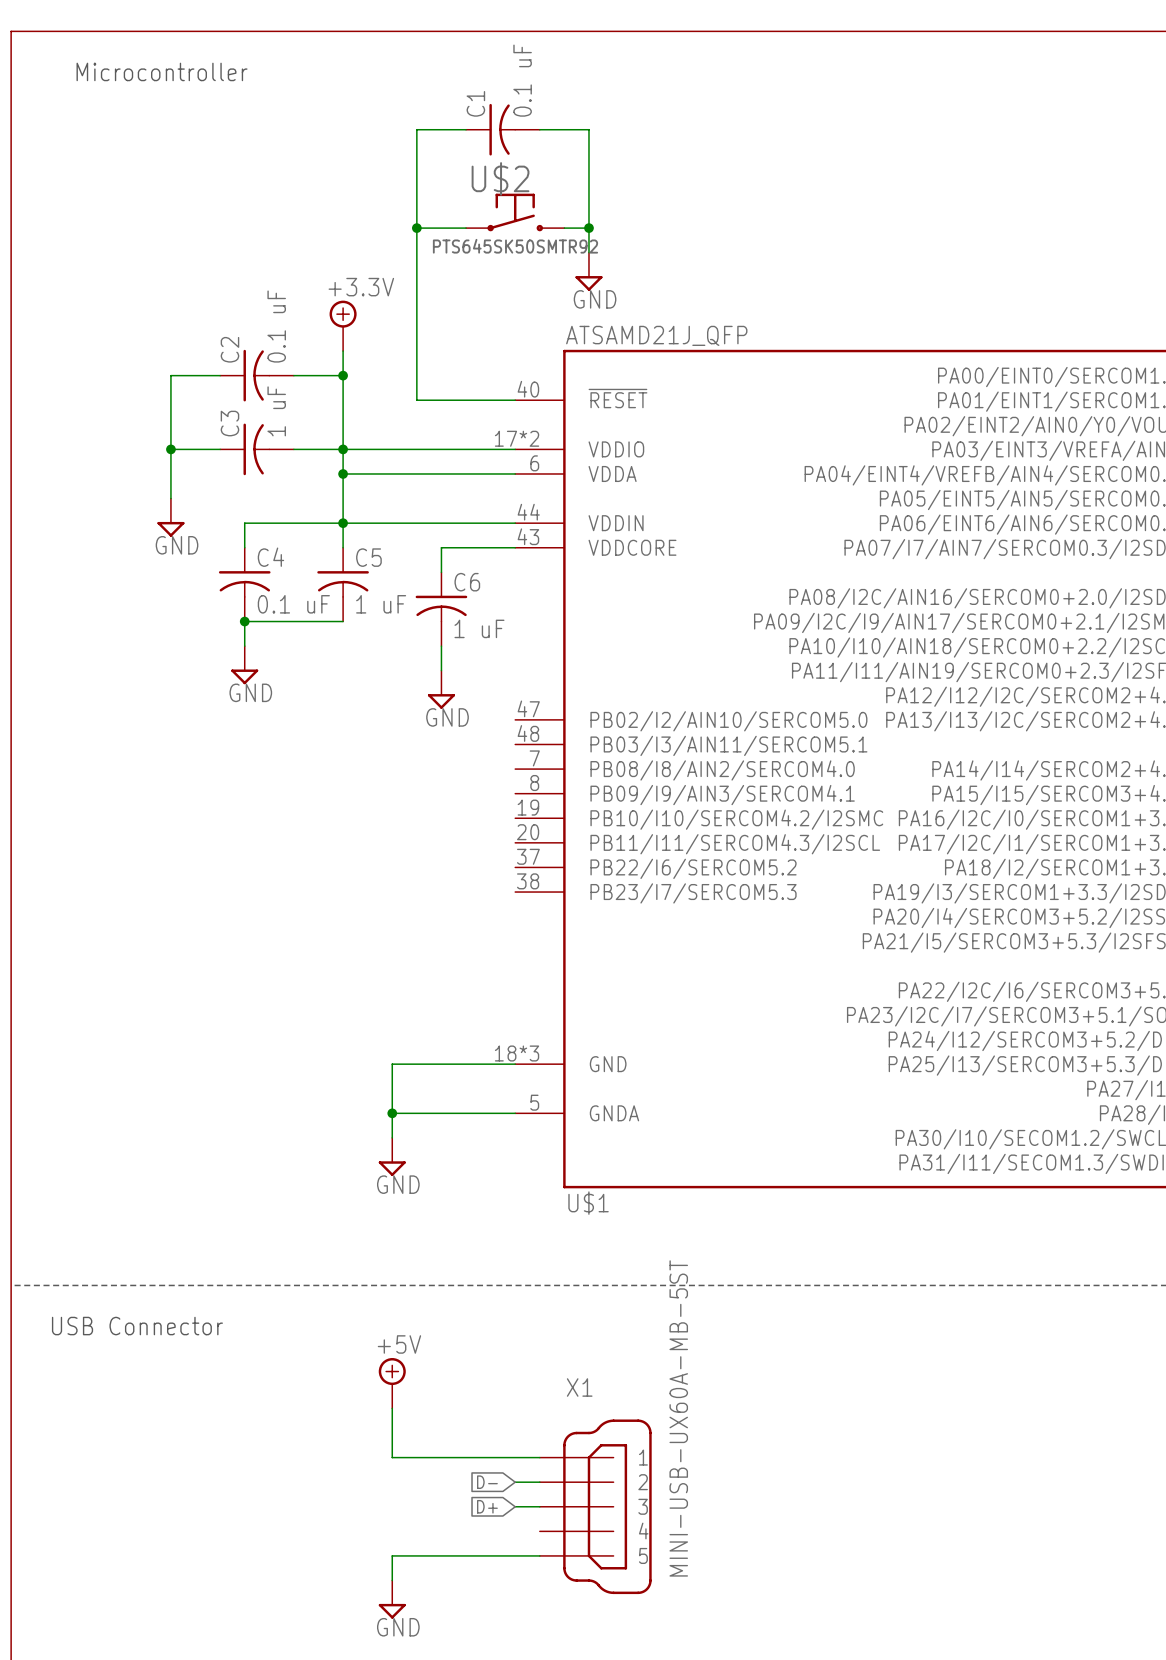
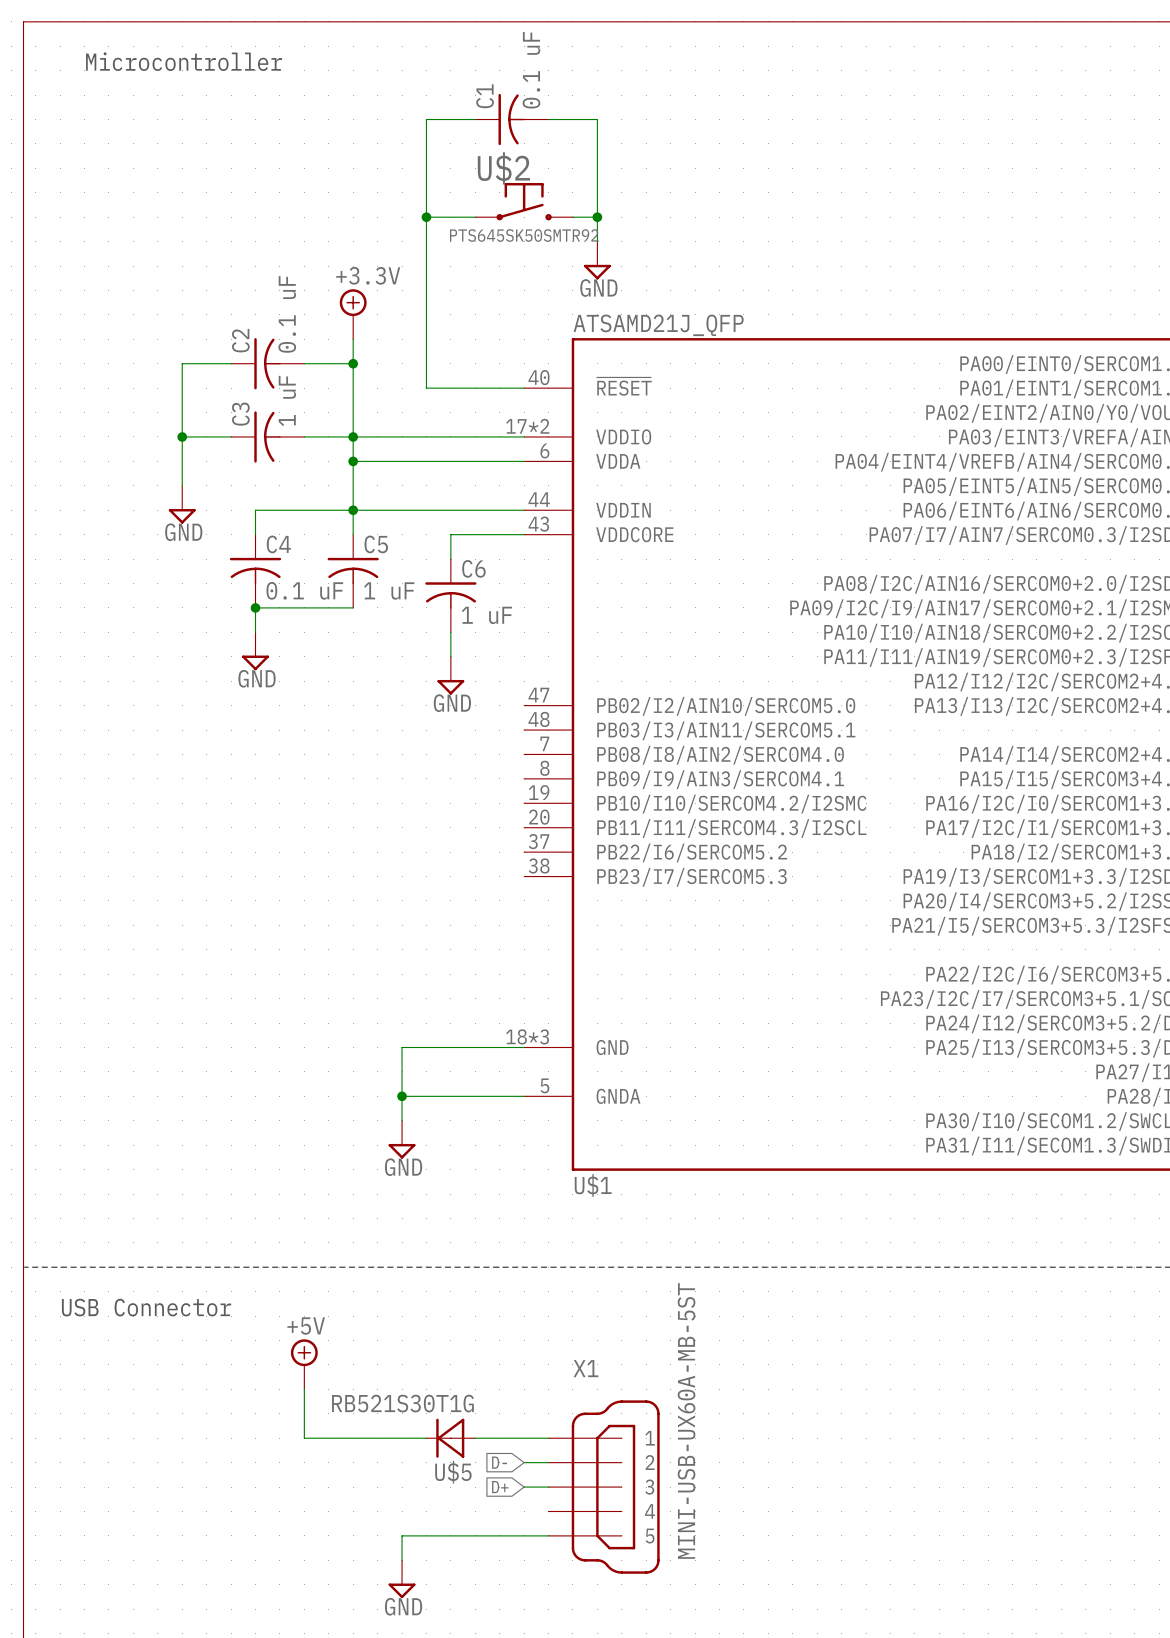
power symbol position: +5V (392, 1383) -> +5V (304, 1364)
wire: (392, 1408) (392, 1457) -> (304, 1389) (304, 1438) (402, 1438)
U$5: none -> RB521S30T1G (450, 1438)

